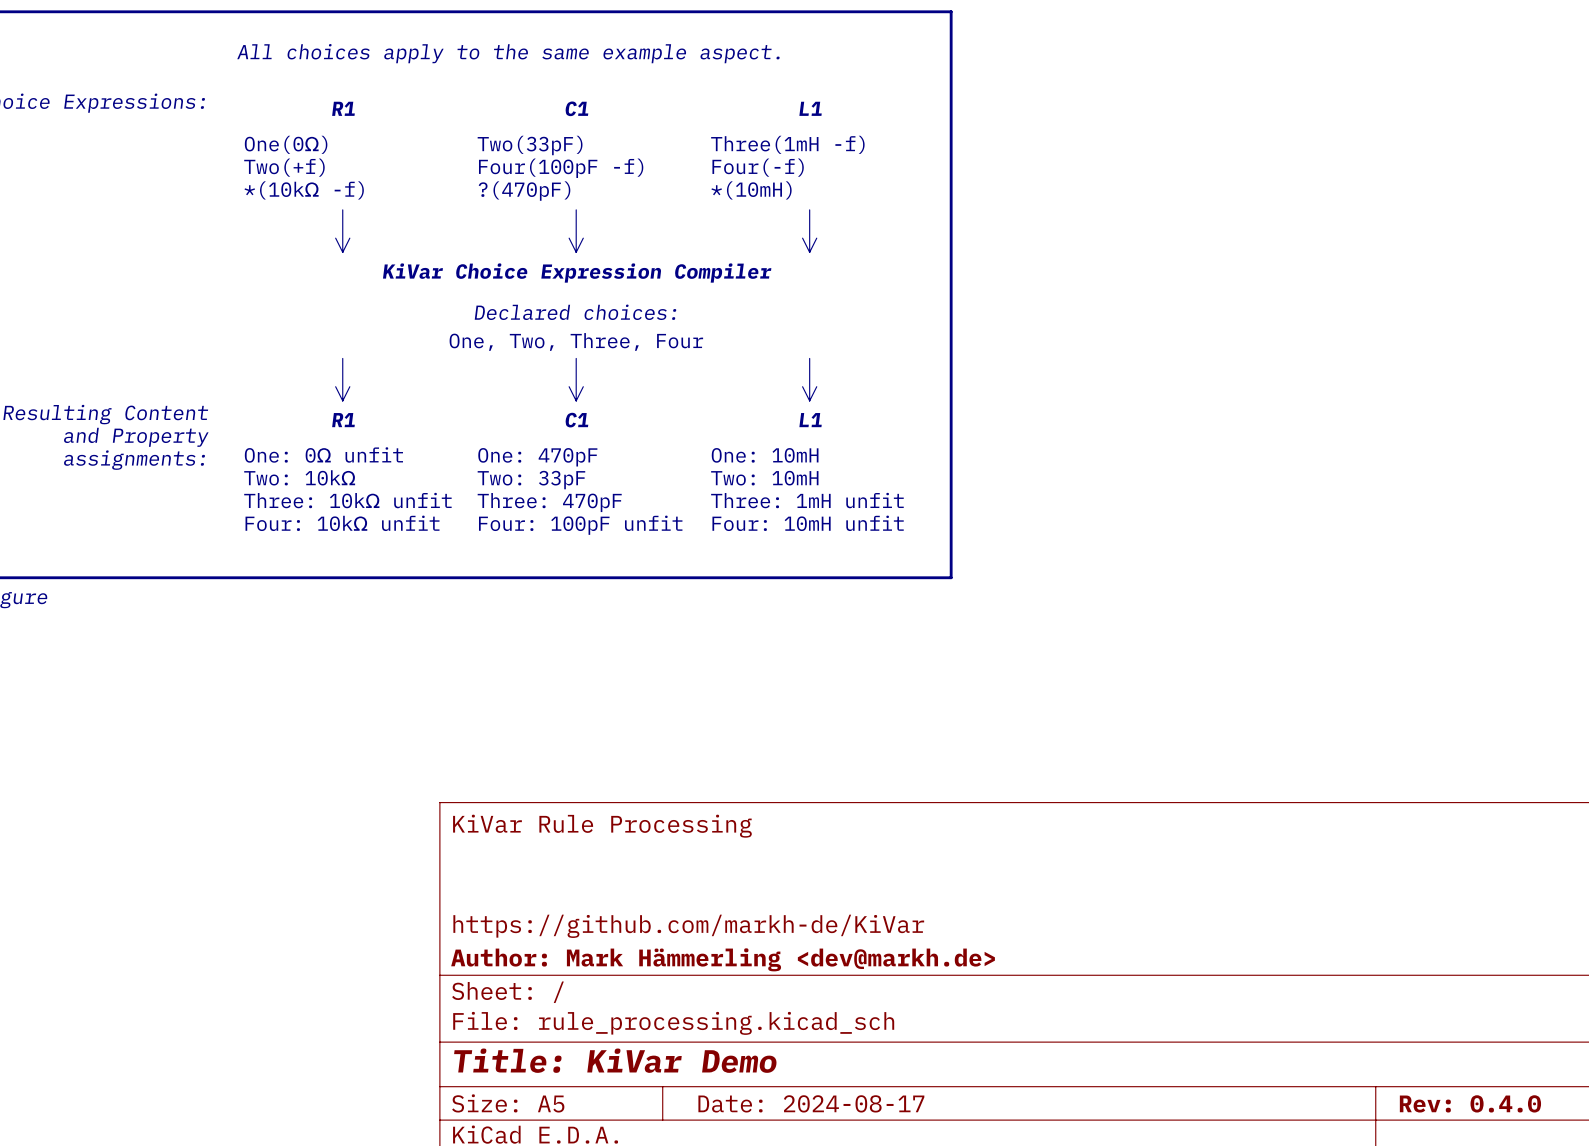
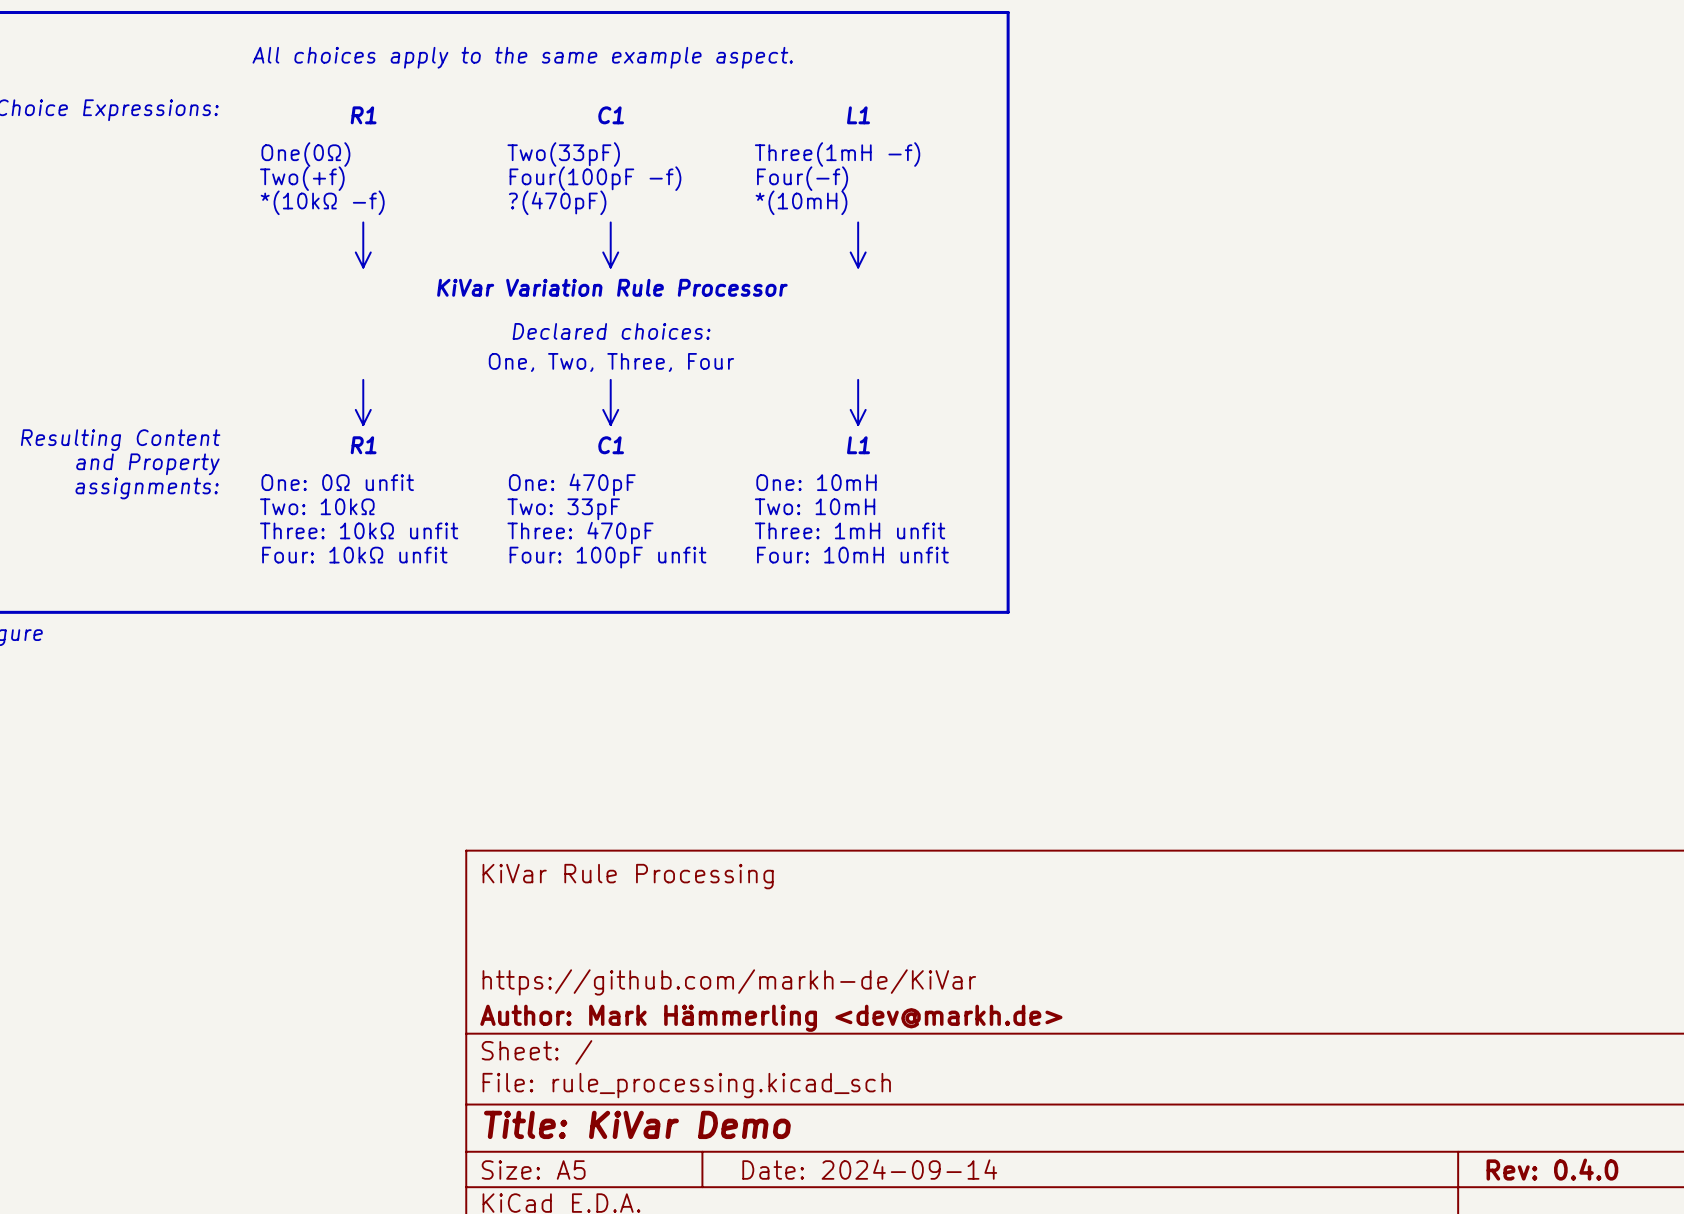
text: KiVar Choice Expression Compiler (577, 273) -> KiVar Variation Rule Processor (612, 287)
title block: Date: 2024-08-17 (811, 1103) -> Date: 2024-09-14 (869, 1169)

